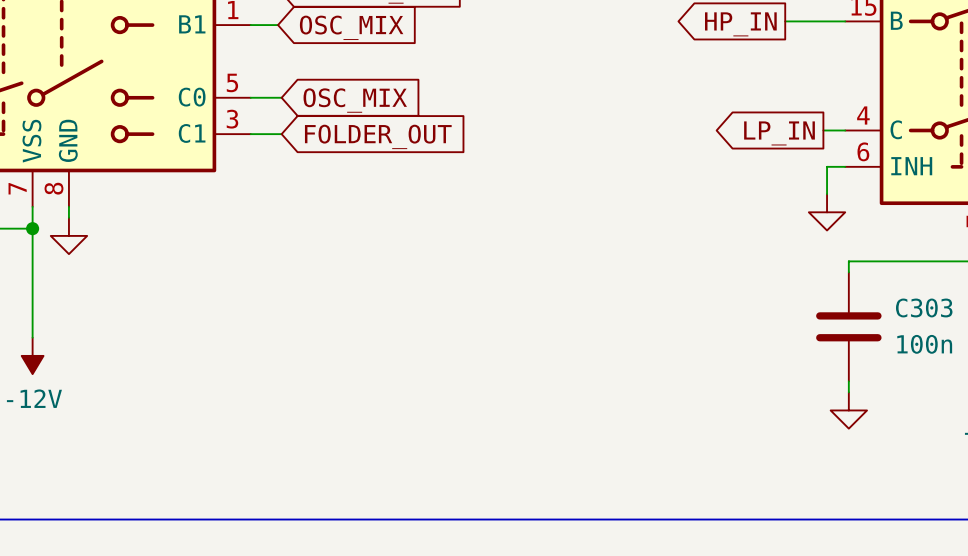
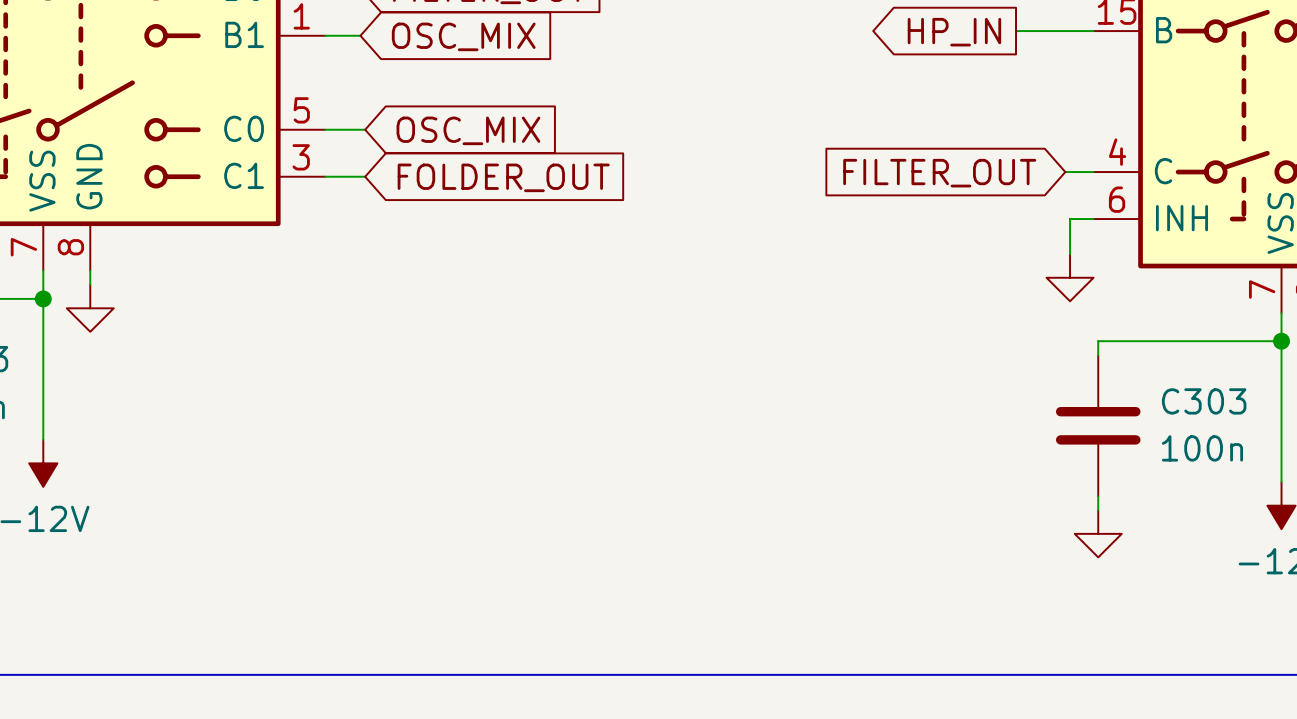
global label shape: output (779, 133) -> input (939, 173)
global label: LP_IN (779, 133) -> FILTER_OUT (939, 173)

